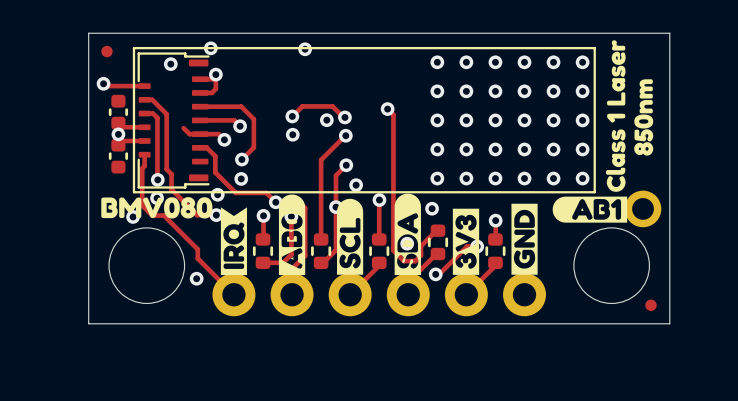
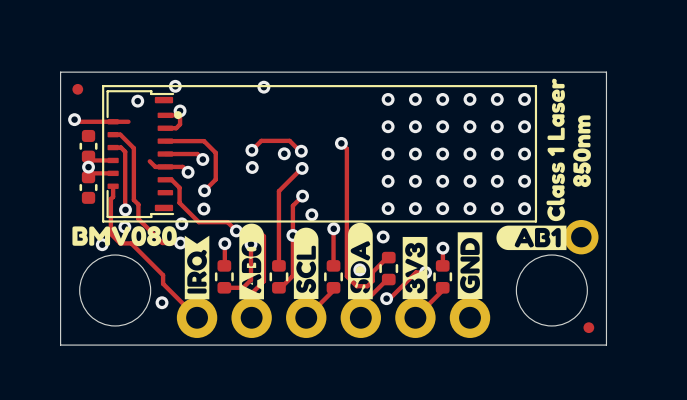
part footprint: [137, 52, 210, 189] -> [106, 90, 183, 219]
track: none -> (113, 121) (128, 121)

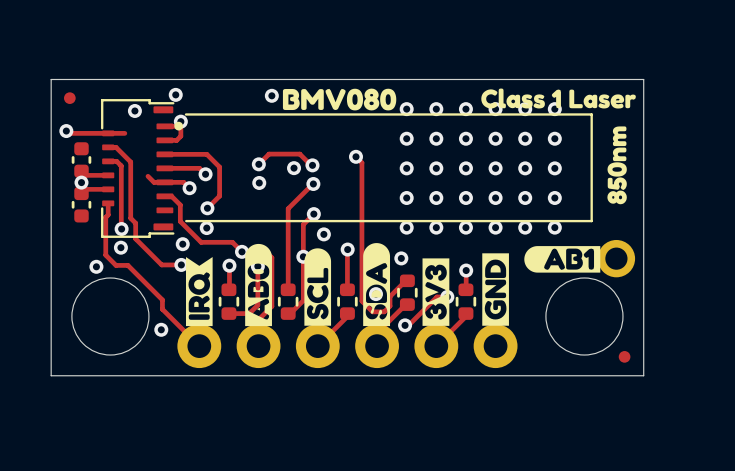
drawing: [546, 78, 565, 222] -> none
drawing: none -> [481, 88, 636, 109]
line: (103, 86) (535, 86) (535, 221) (103, 221) (103, 86) -> none
line: none -> (186, 114) (591, 114) (591, 221) (186, 221)
drawing position: (124, 236) -> (339, 99)

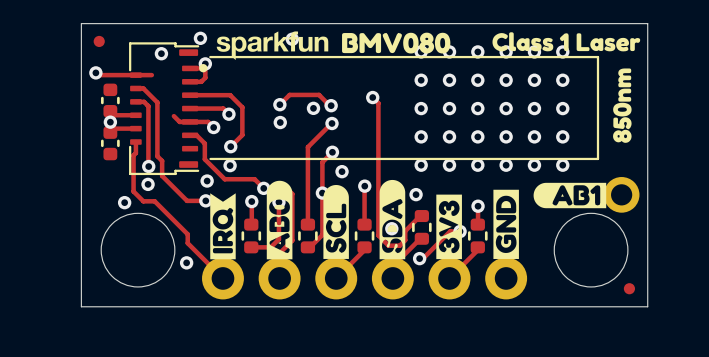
drawing: none -> [216, 31, 329, 61]
drawing position: (339, 99) -> (396, 43)

